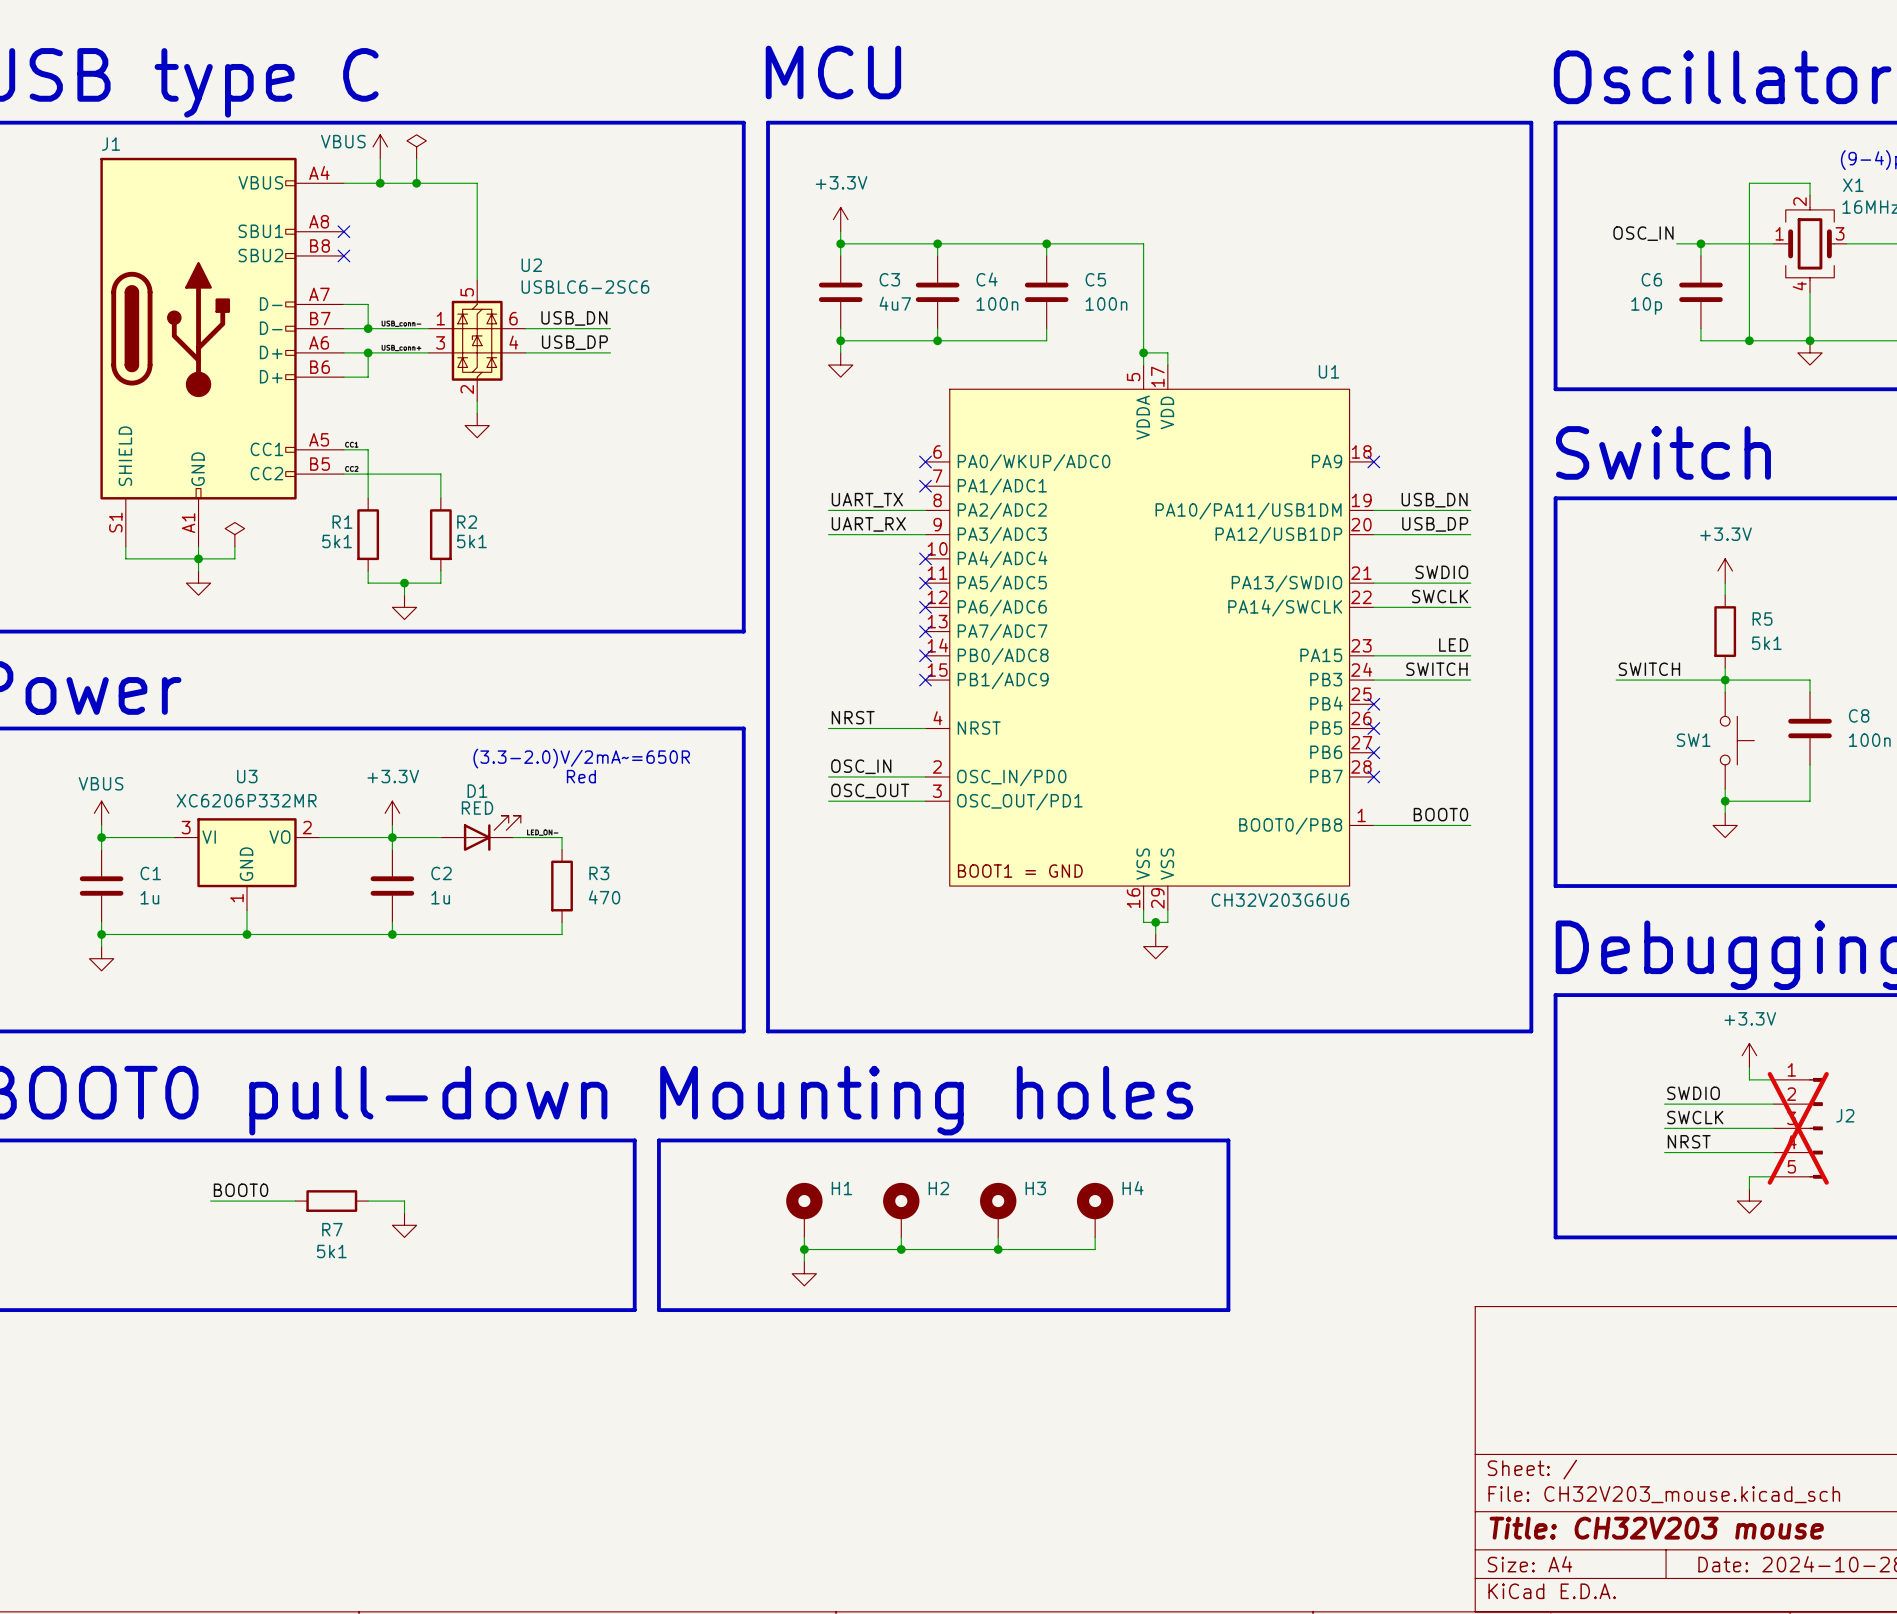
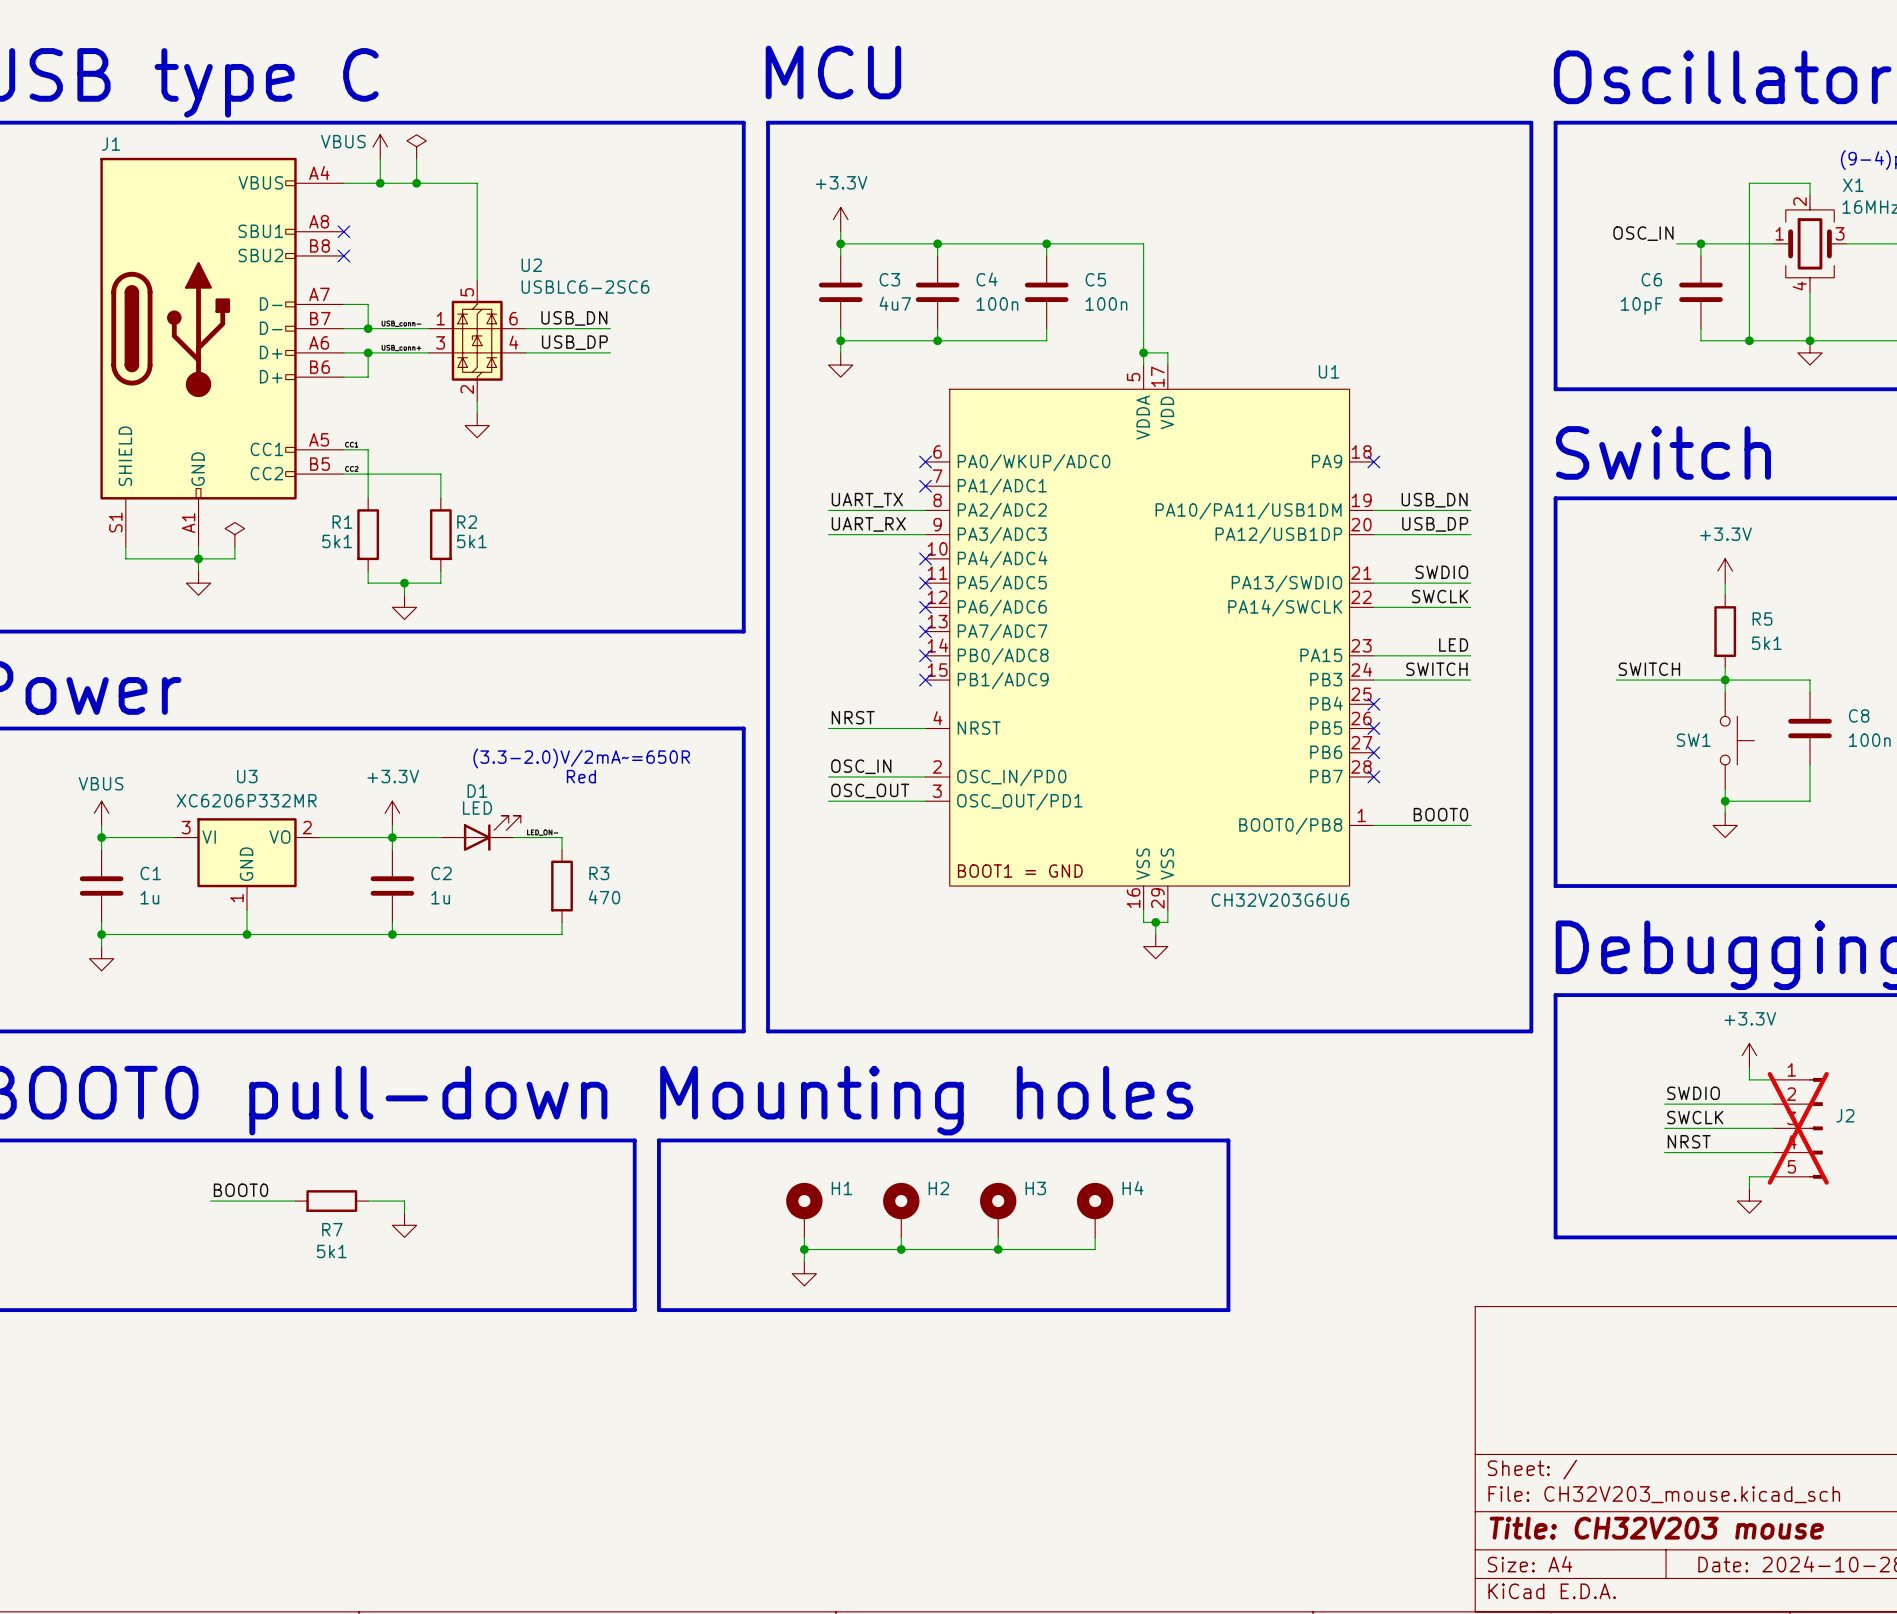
C6 value: 10p (1646, 306) -> 10pF (1641, 306)
D1 value: RED (477, 808) -> LED (477, 808)

